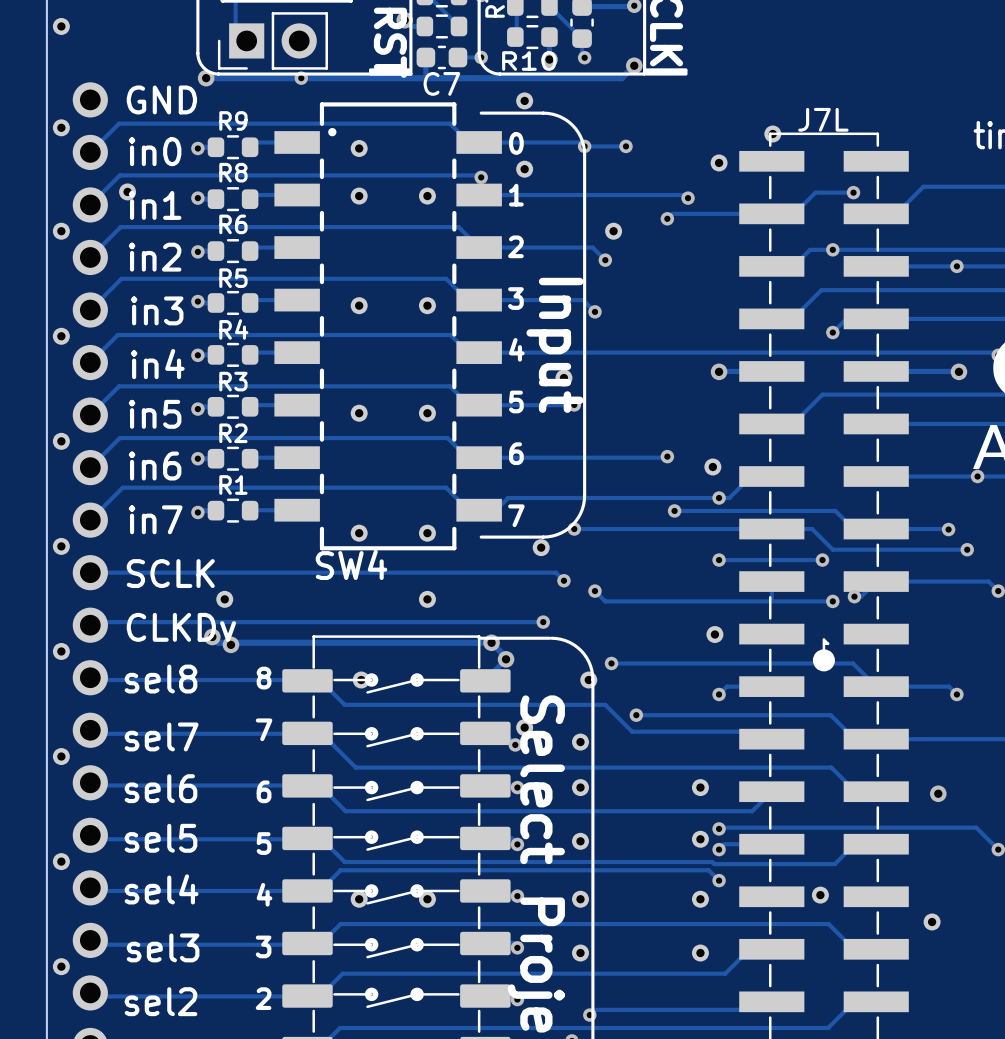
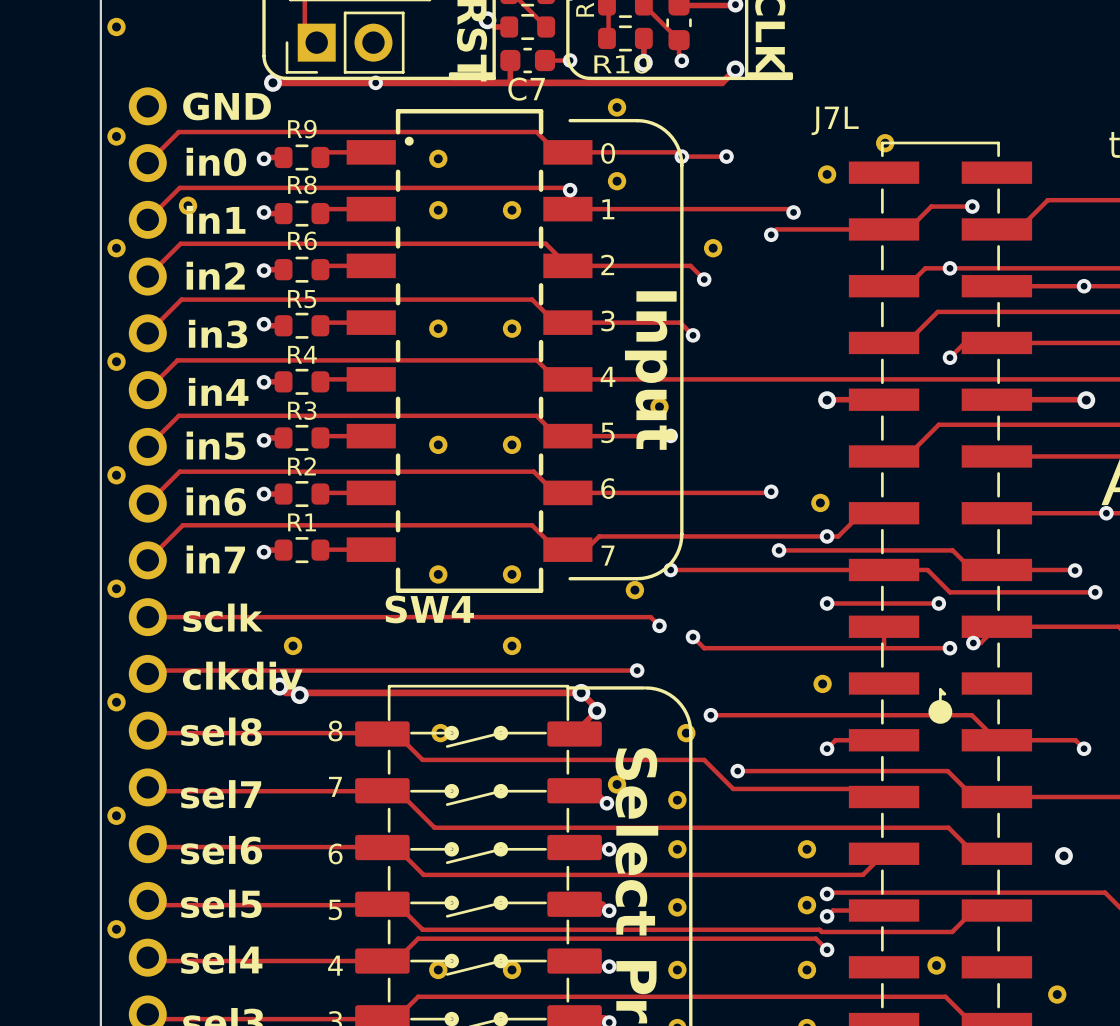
J7L name position: J7L (823, 119) -> J7L (835, 120)
text: SCLK (170, 573) -> sclk (223, 617)
text: CLKDv (181, 627) -> clkdiv (242, 675)
J7L footprint: [812, 638, 835, 672] -> [928, 688, 953, 724]

